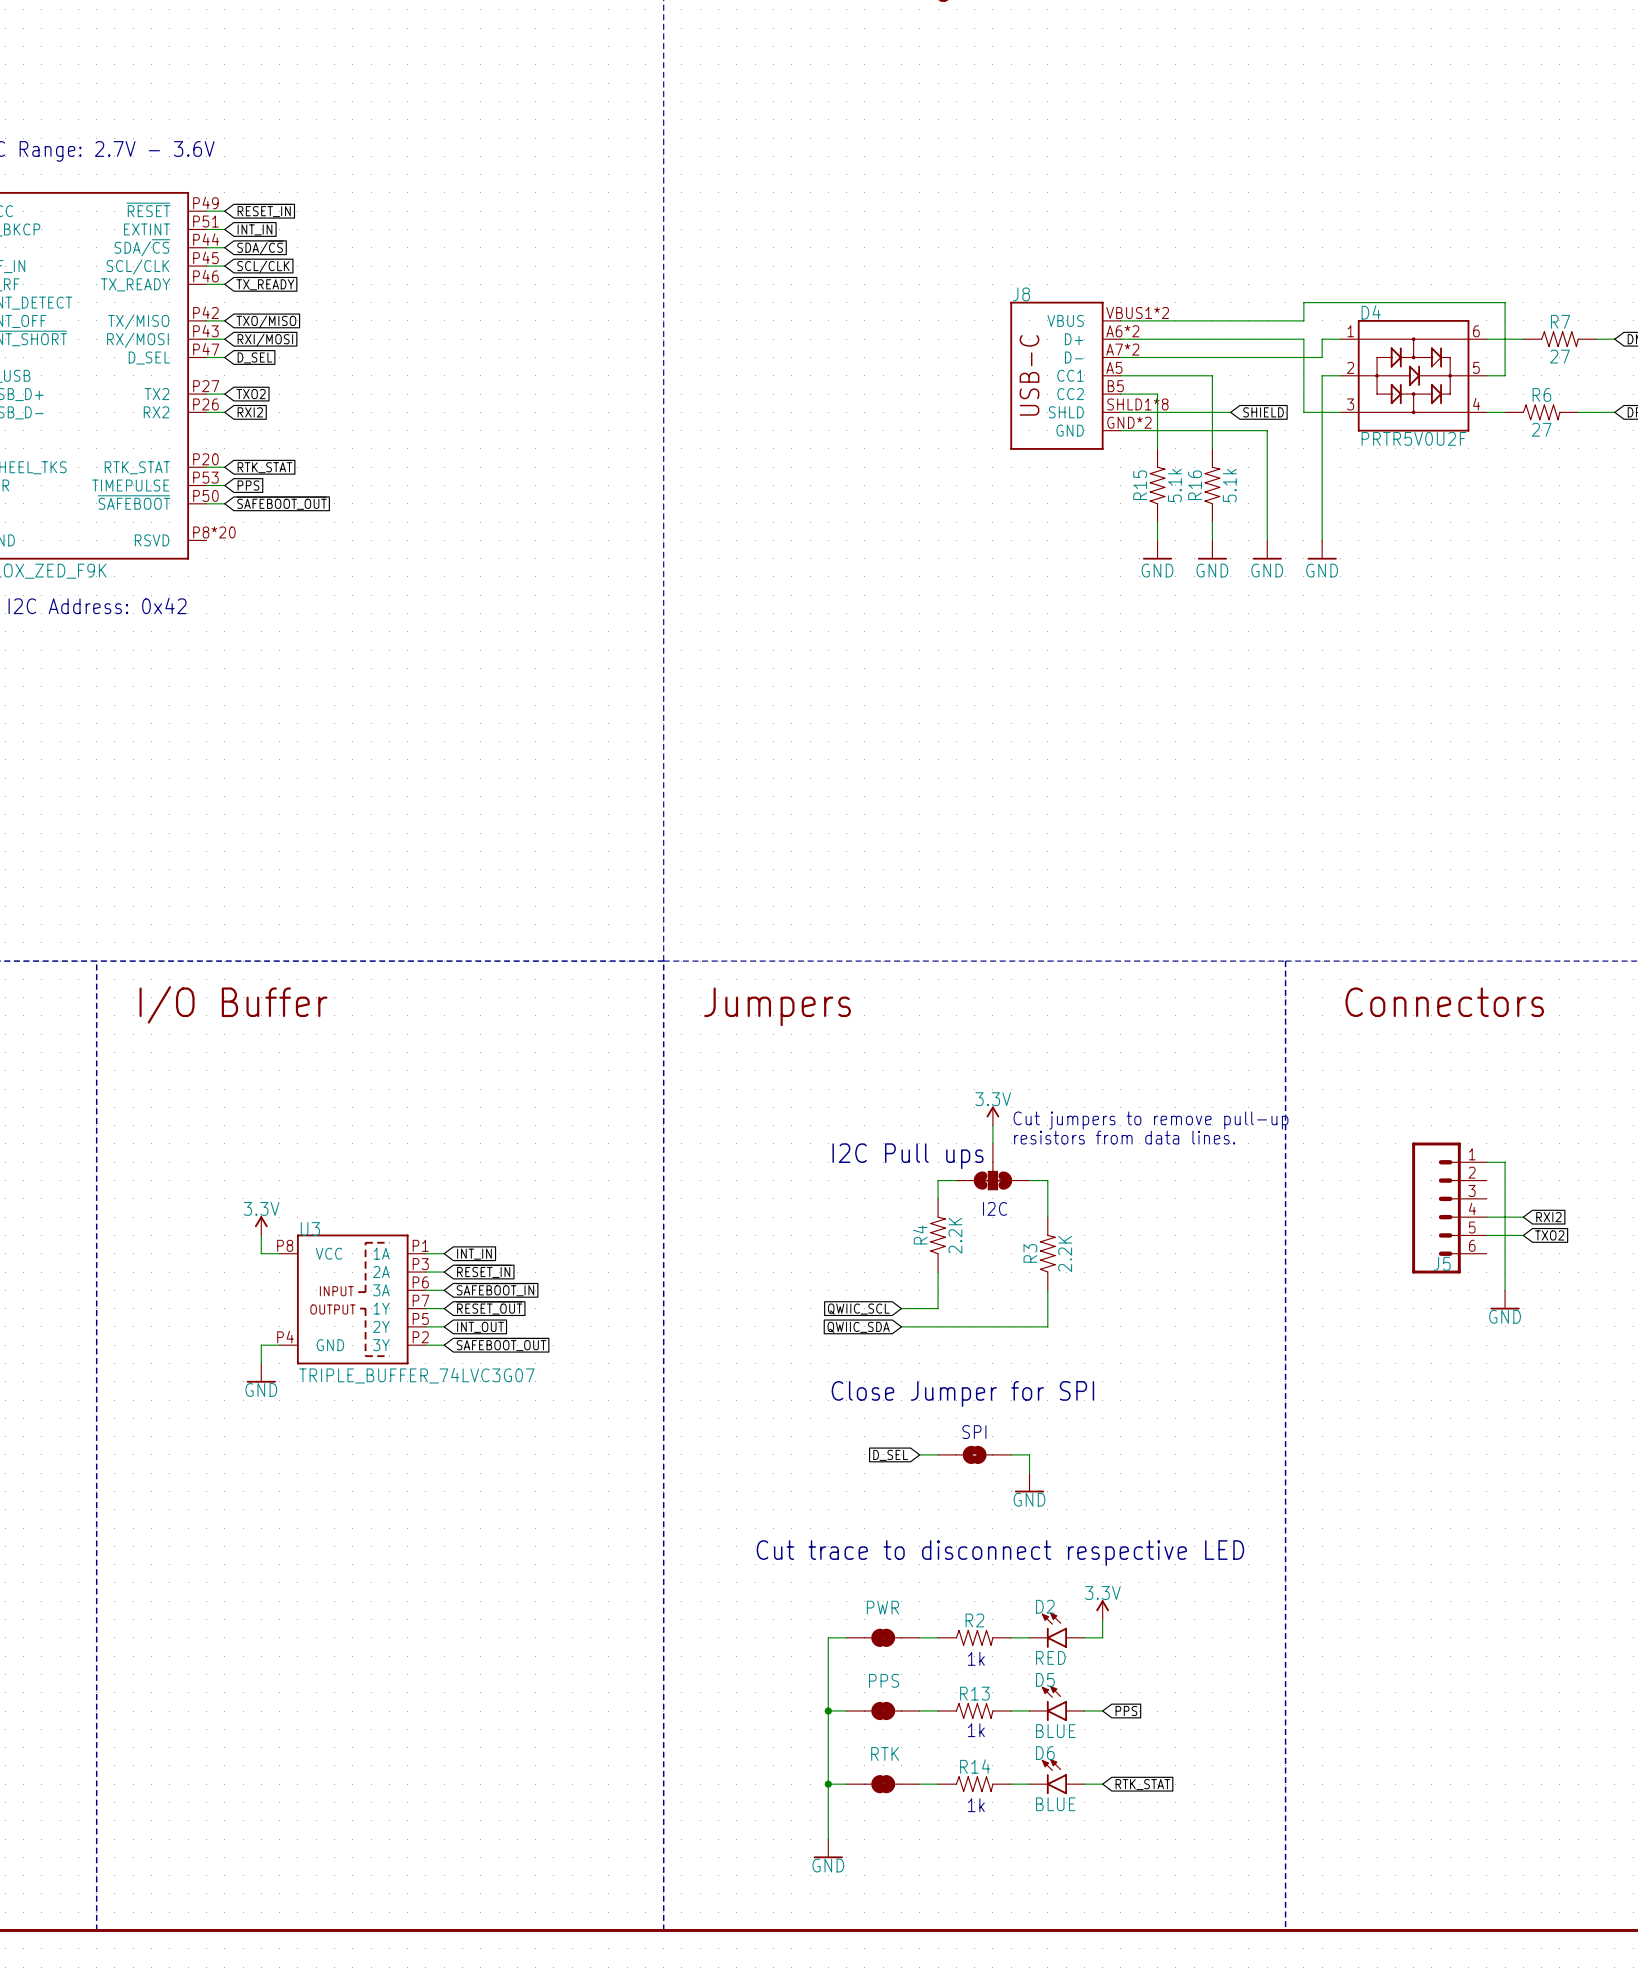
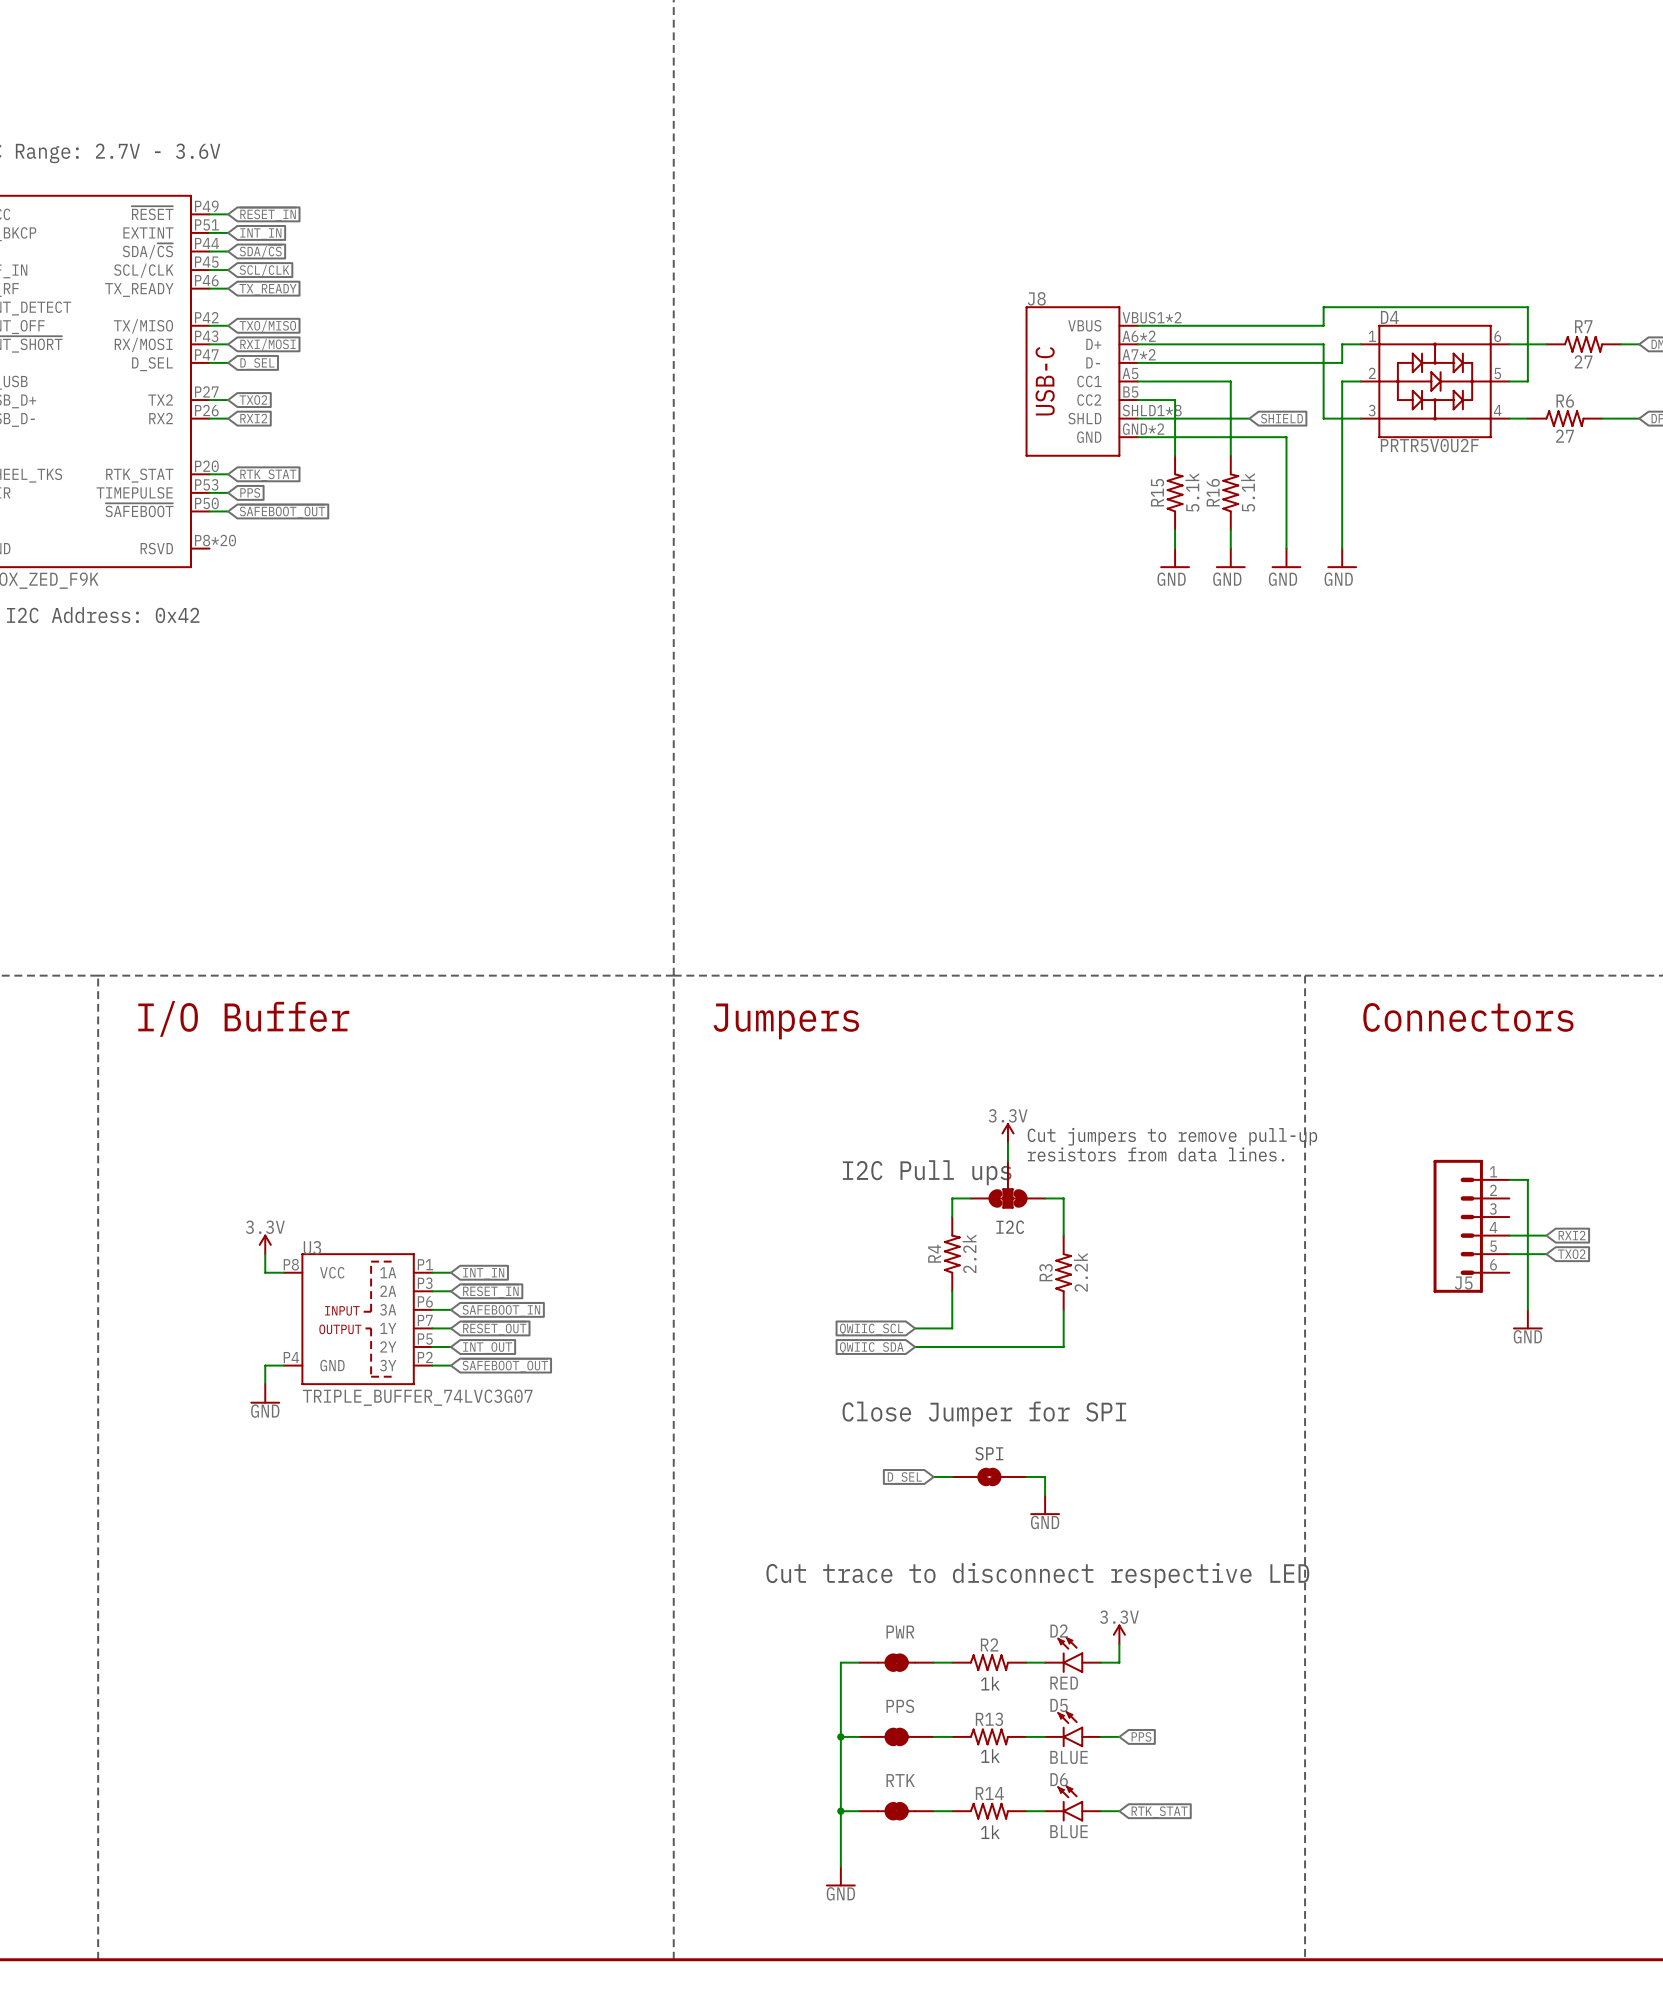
R4 value: 2.2K (955, 1235) -> 2.2k (969, 1253)
R3 value: 2.2K (1065, 1254) -> 2.2k (1081, 1272)

